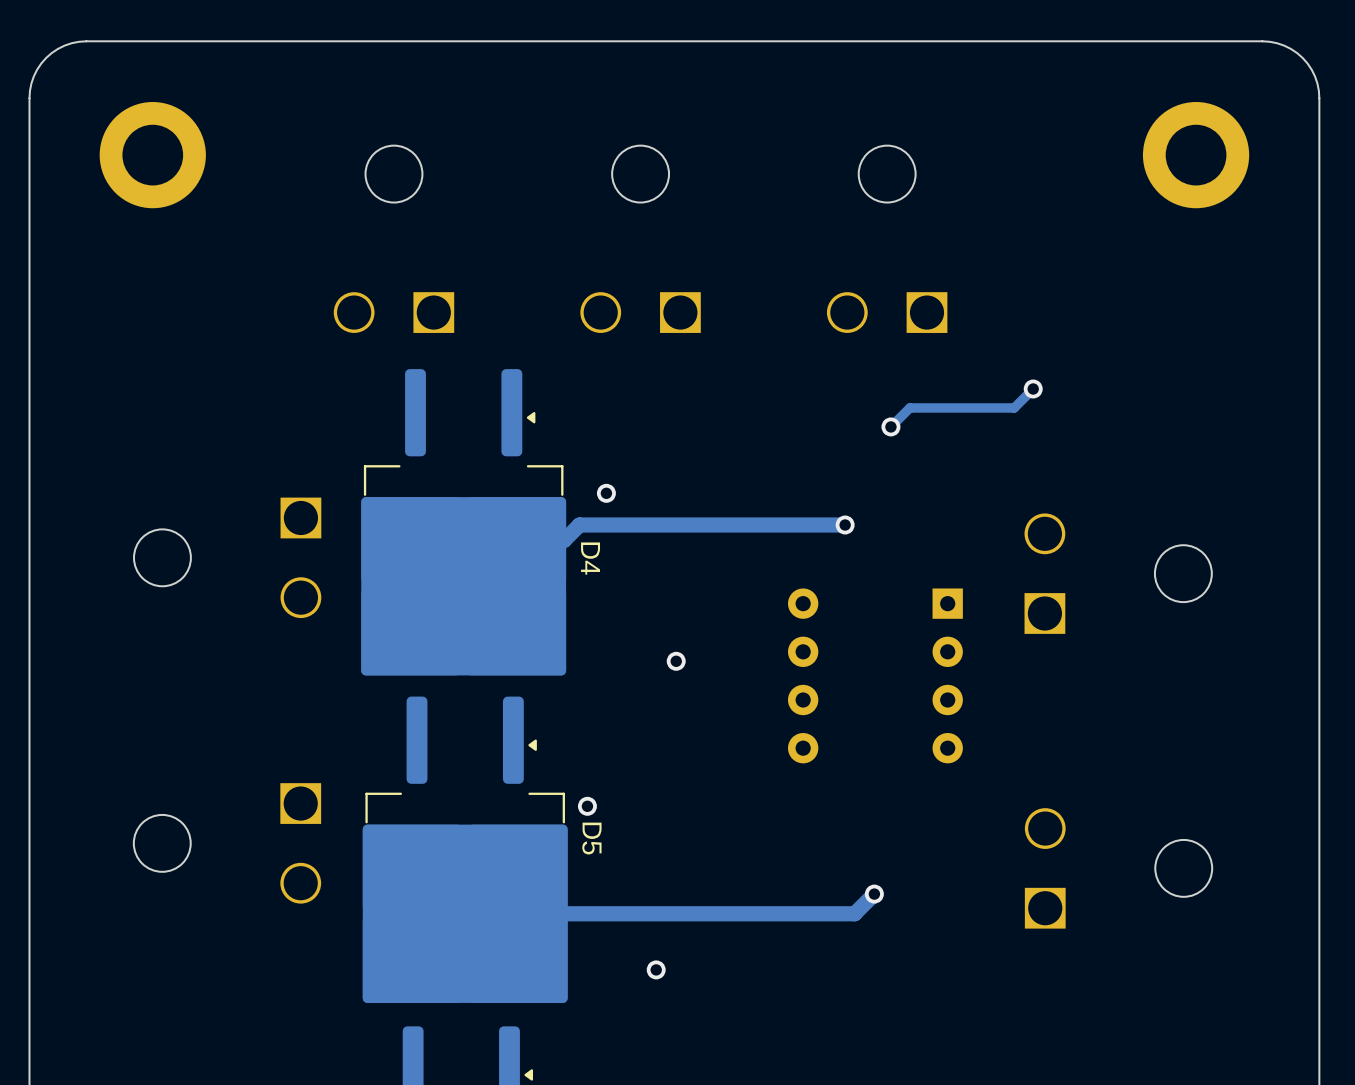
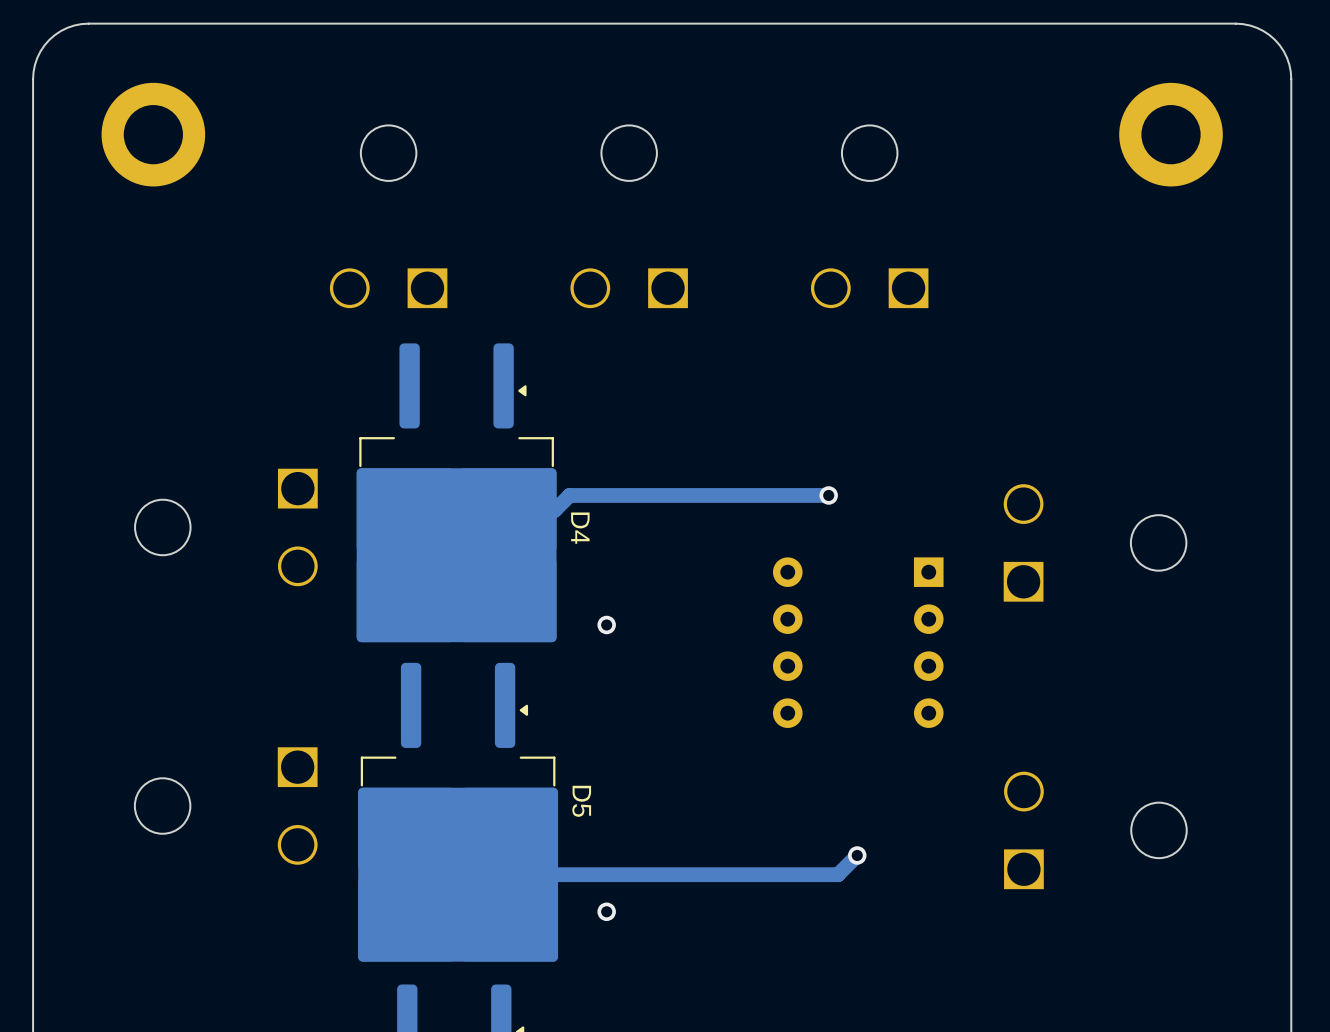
track: (1033, 388) (1014, 407) (909, 407) (890, 426) -> none
via: (1033, 388) -> none
via: (890, 426) -> none
via: (606, 493) -> none
via position: (676, 661) -> (606, 624)
via: (587, 806) -> none
via position: (656, 969) -> (606, 911)

